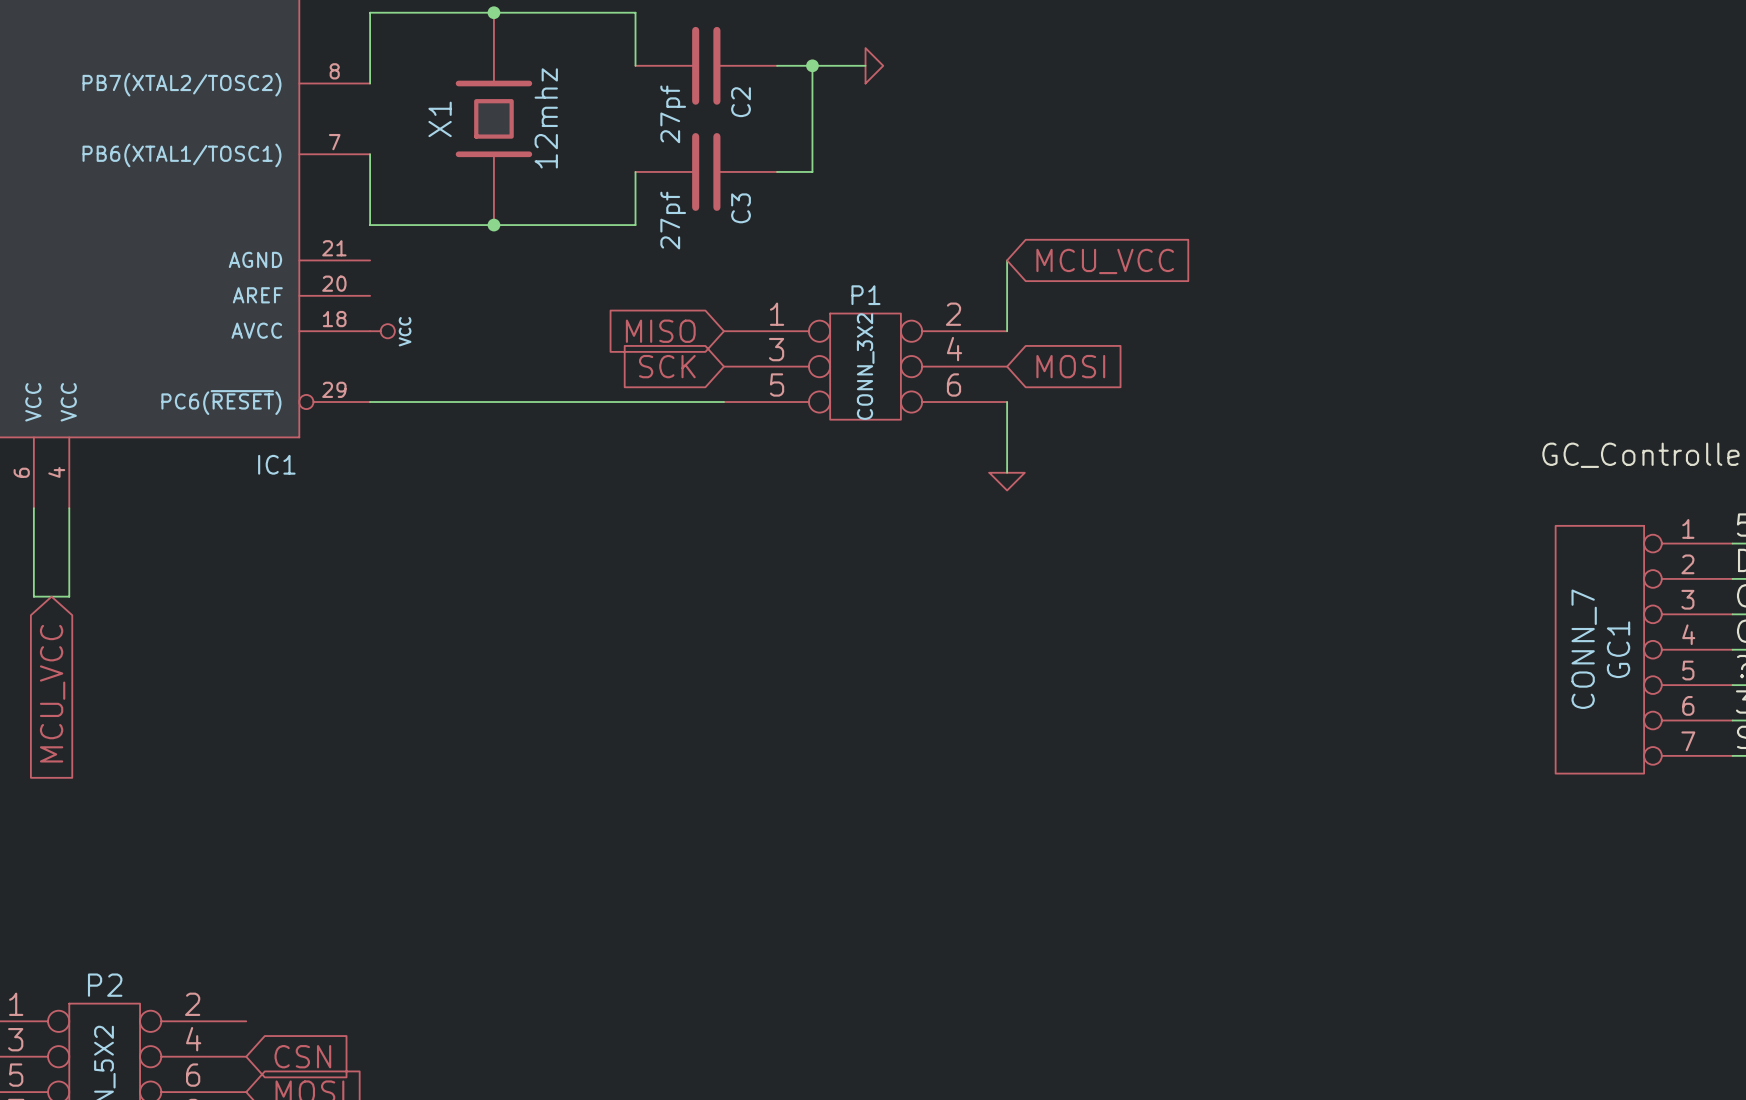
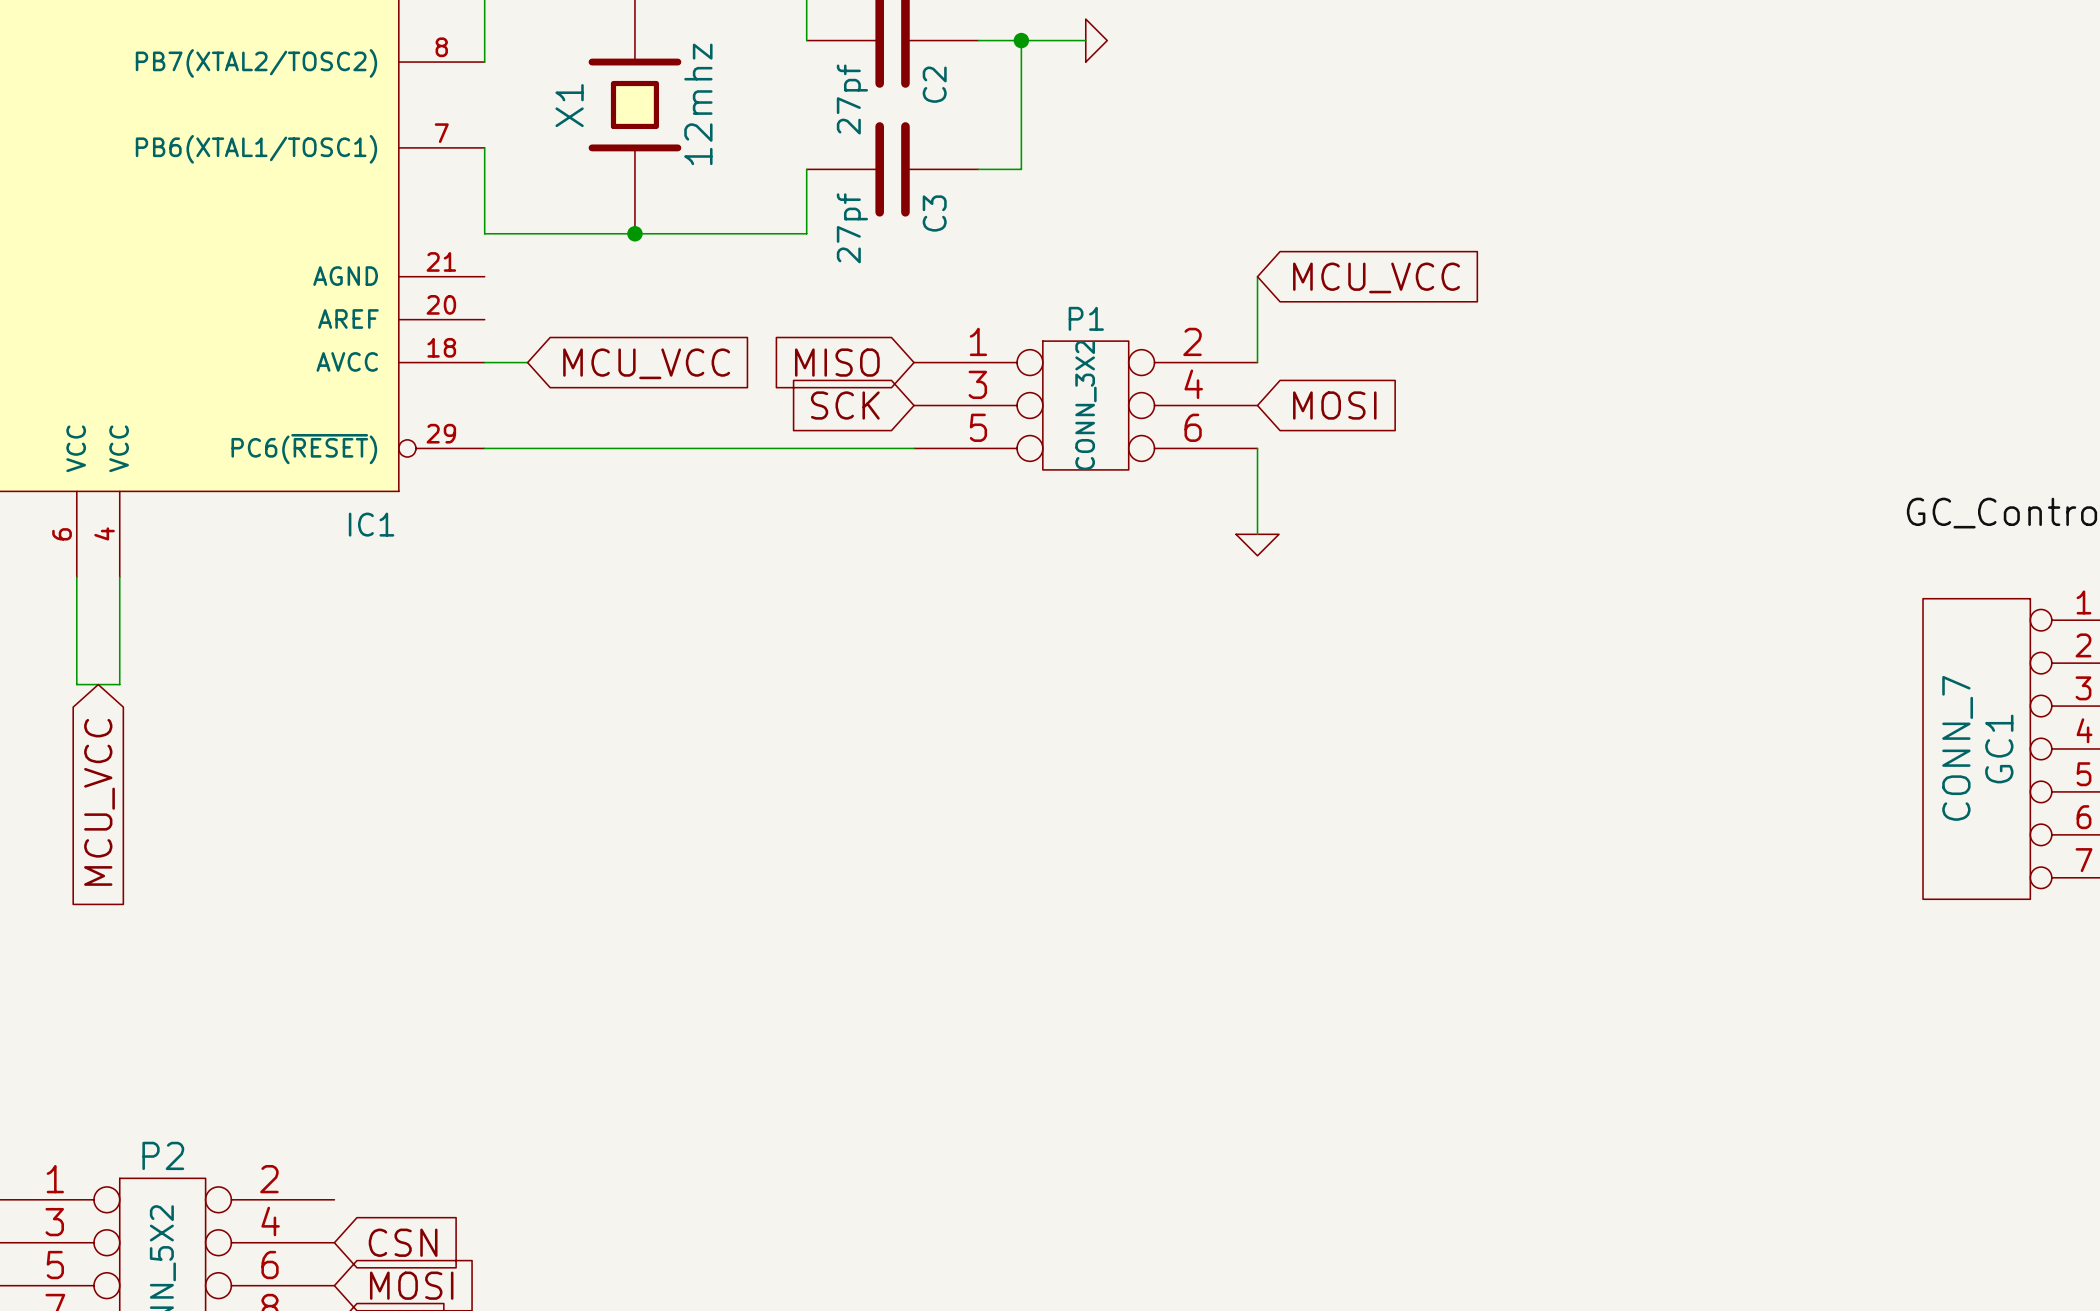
wire: none -> (484, 362) (527, 362)
power symbol: VCC (382, 331) -> none
global label: none -> MCU_VCC (646, 363)

